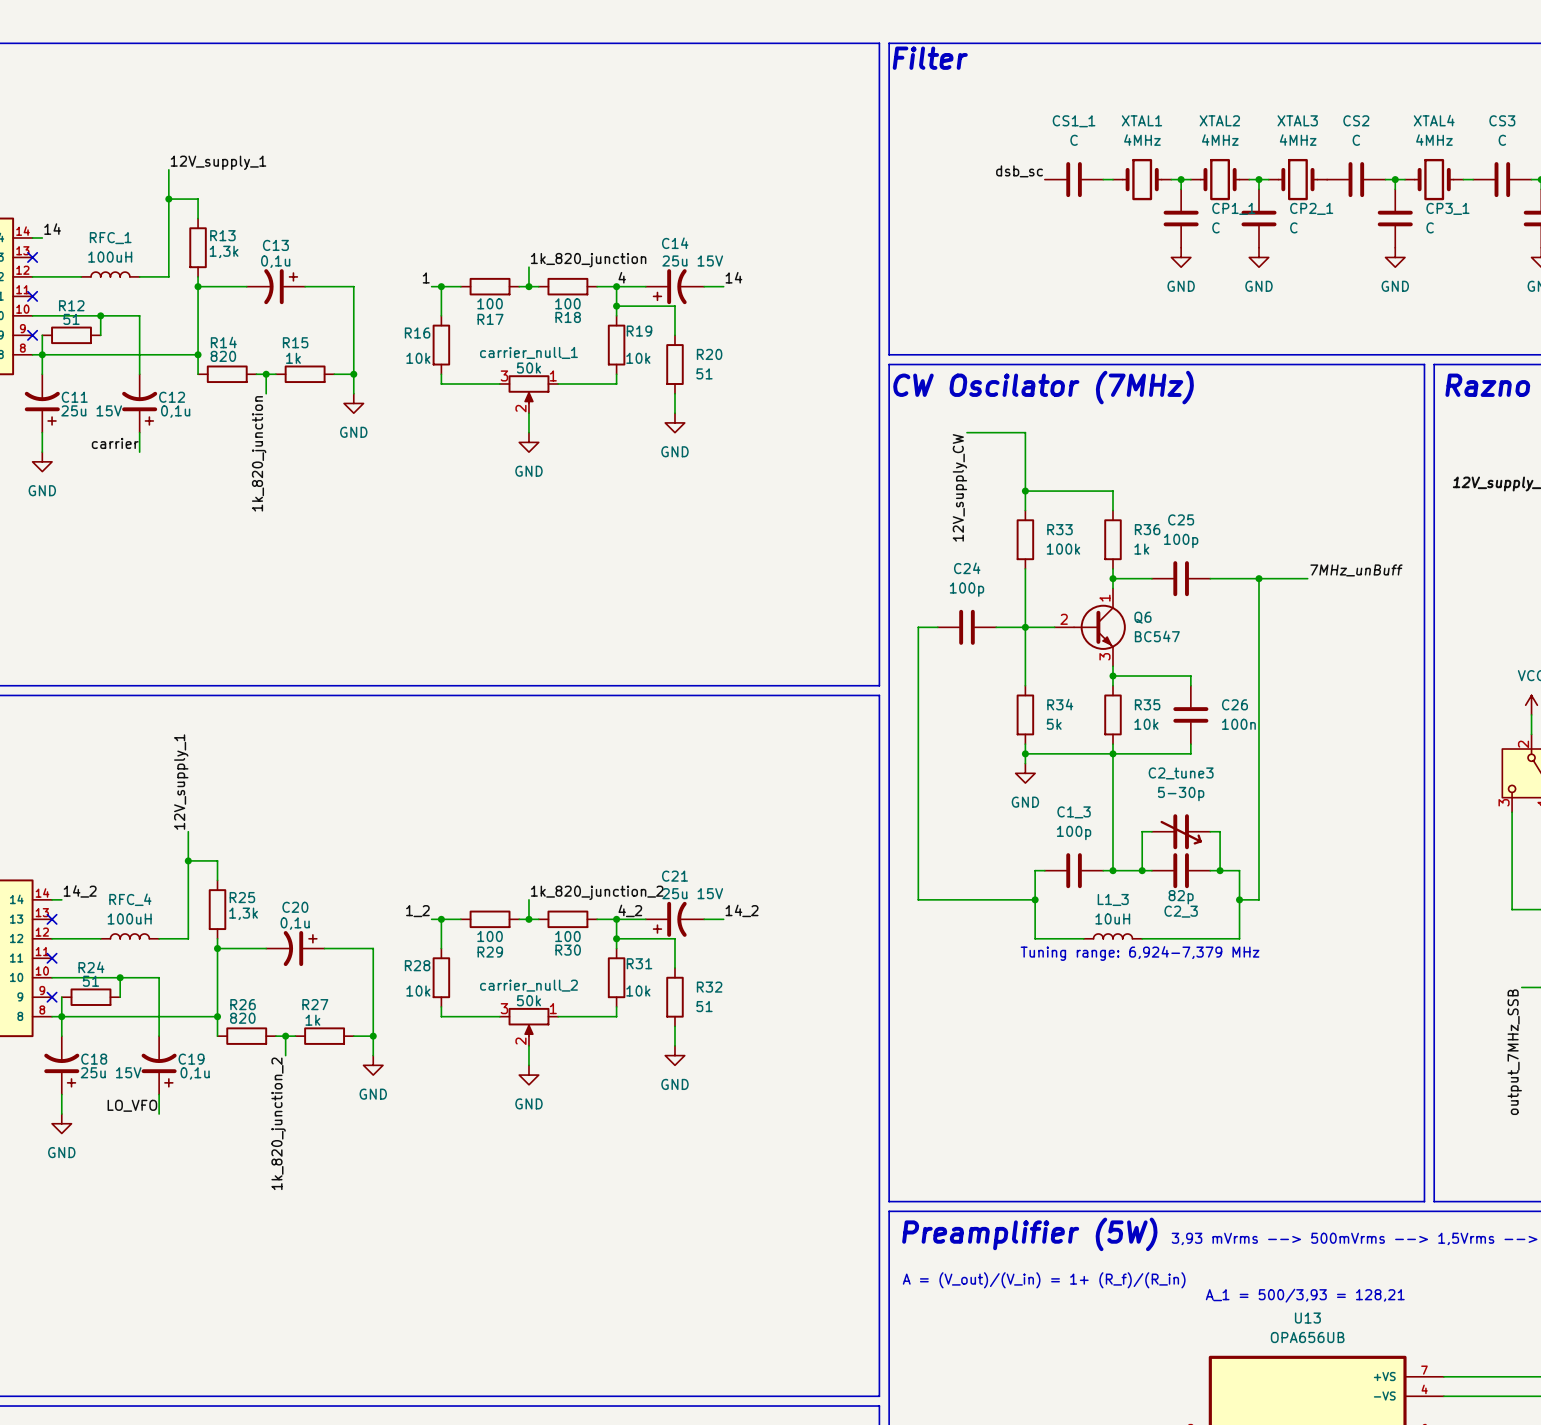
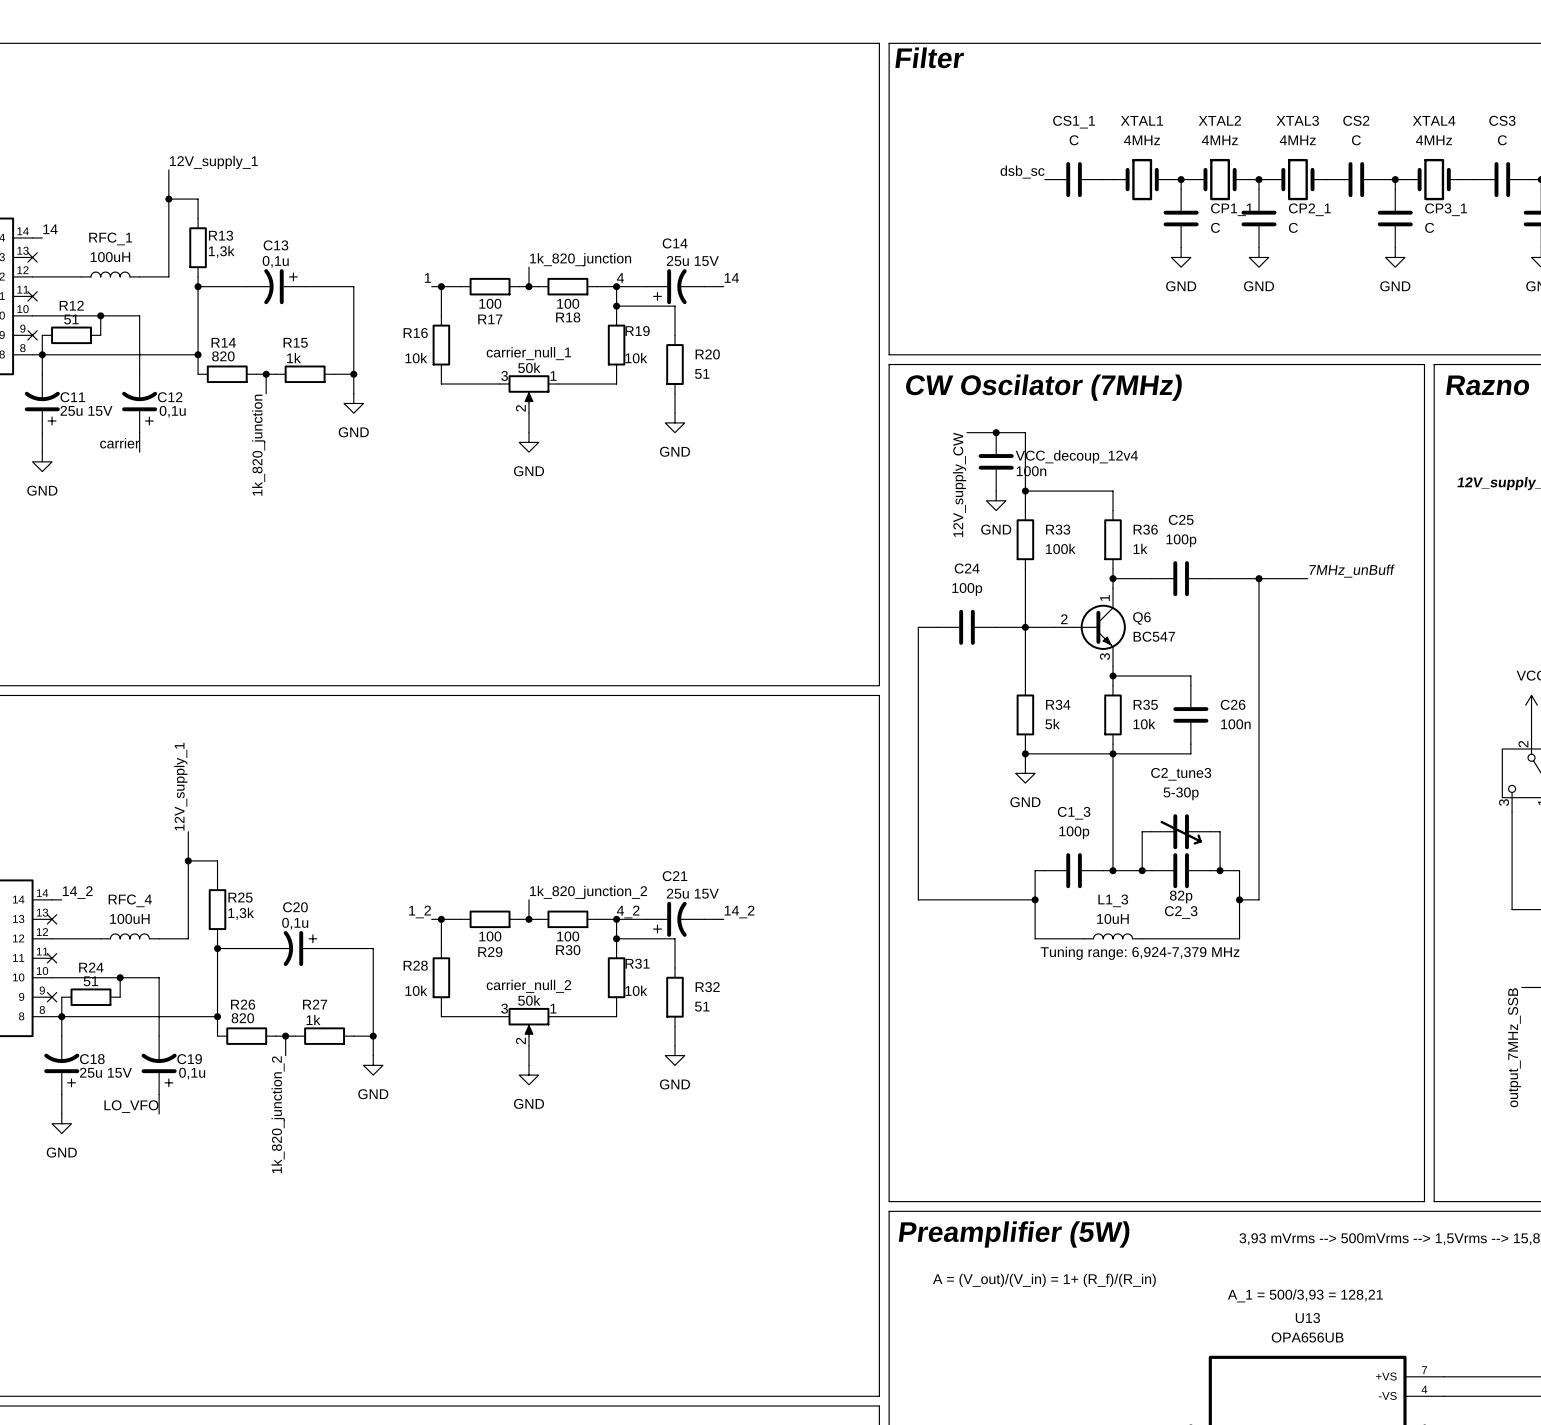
junction: none -> (996, 432)
VCC_decoup_12v4: none -> 100n (996, 461)
power symbol: none -> GND (996, 500)

